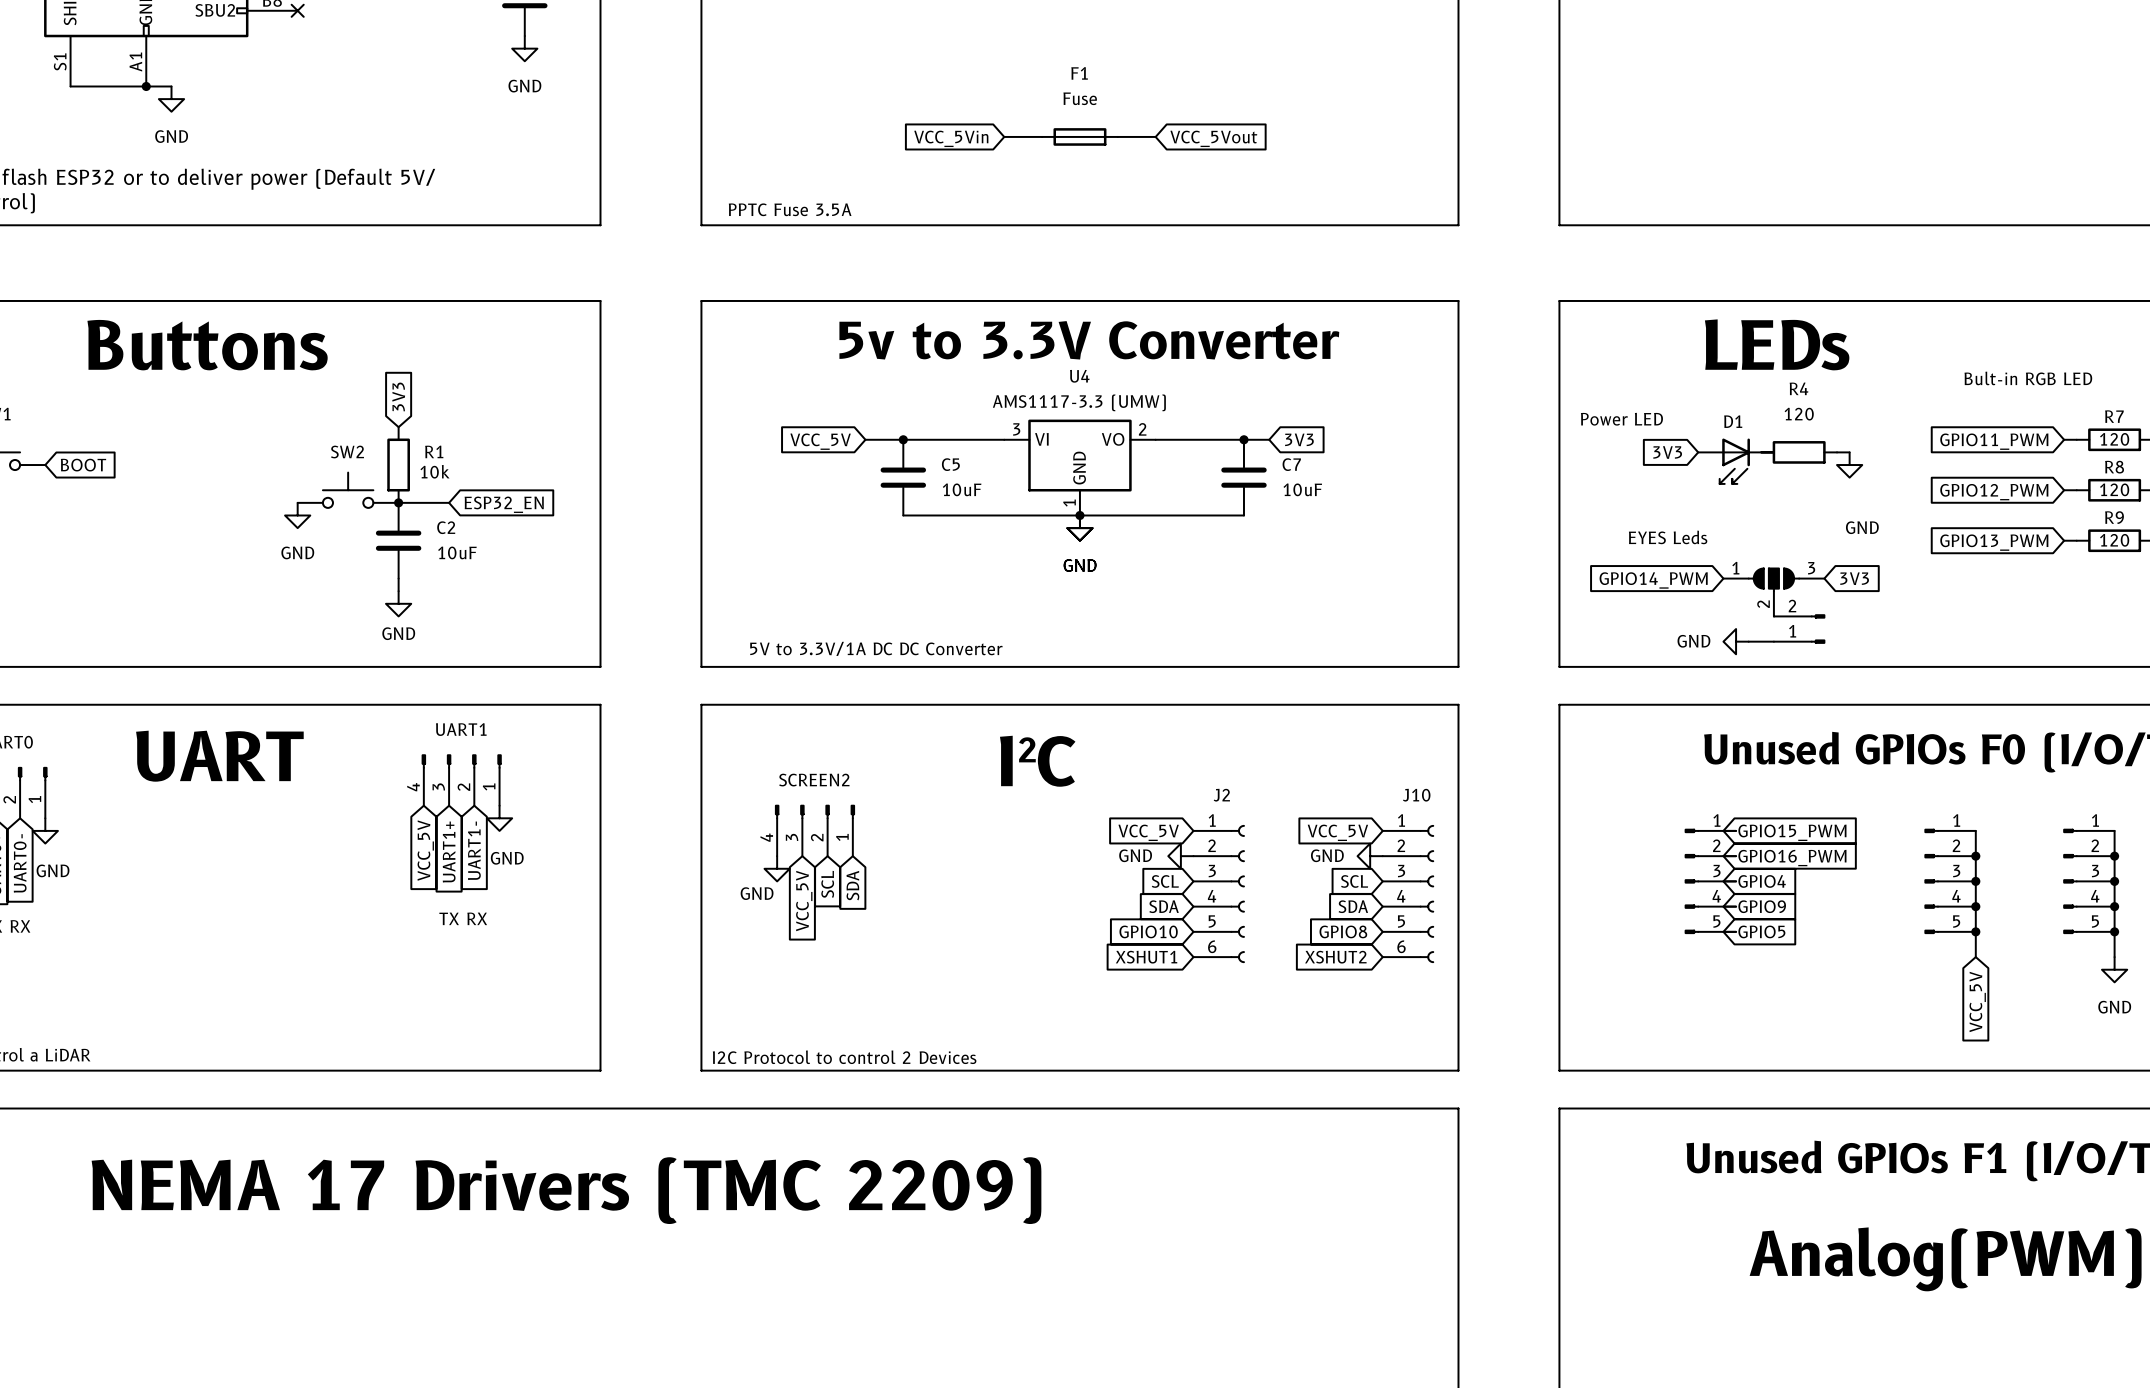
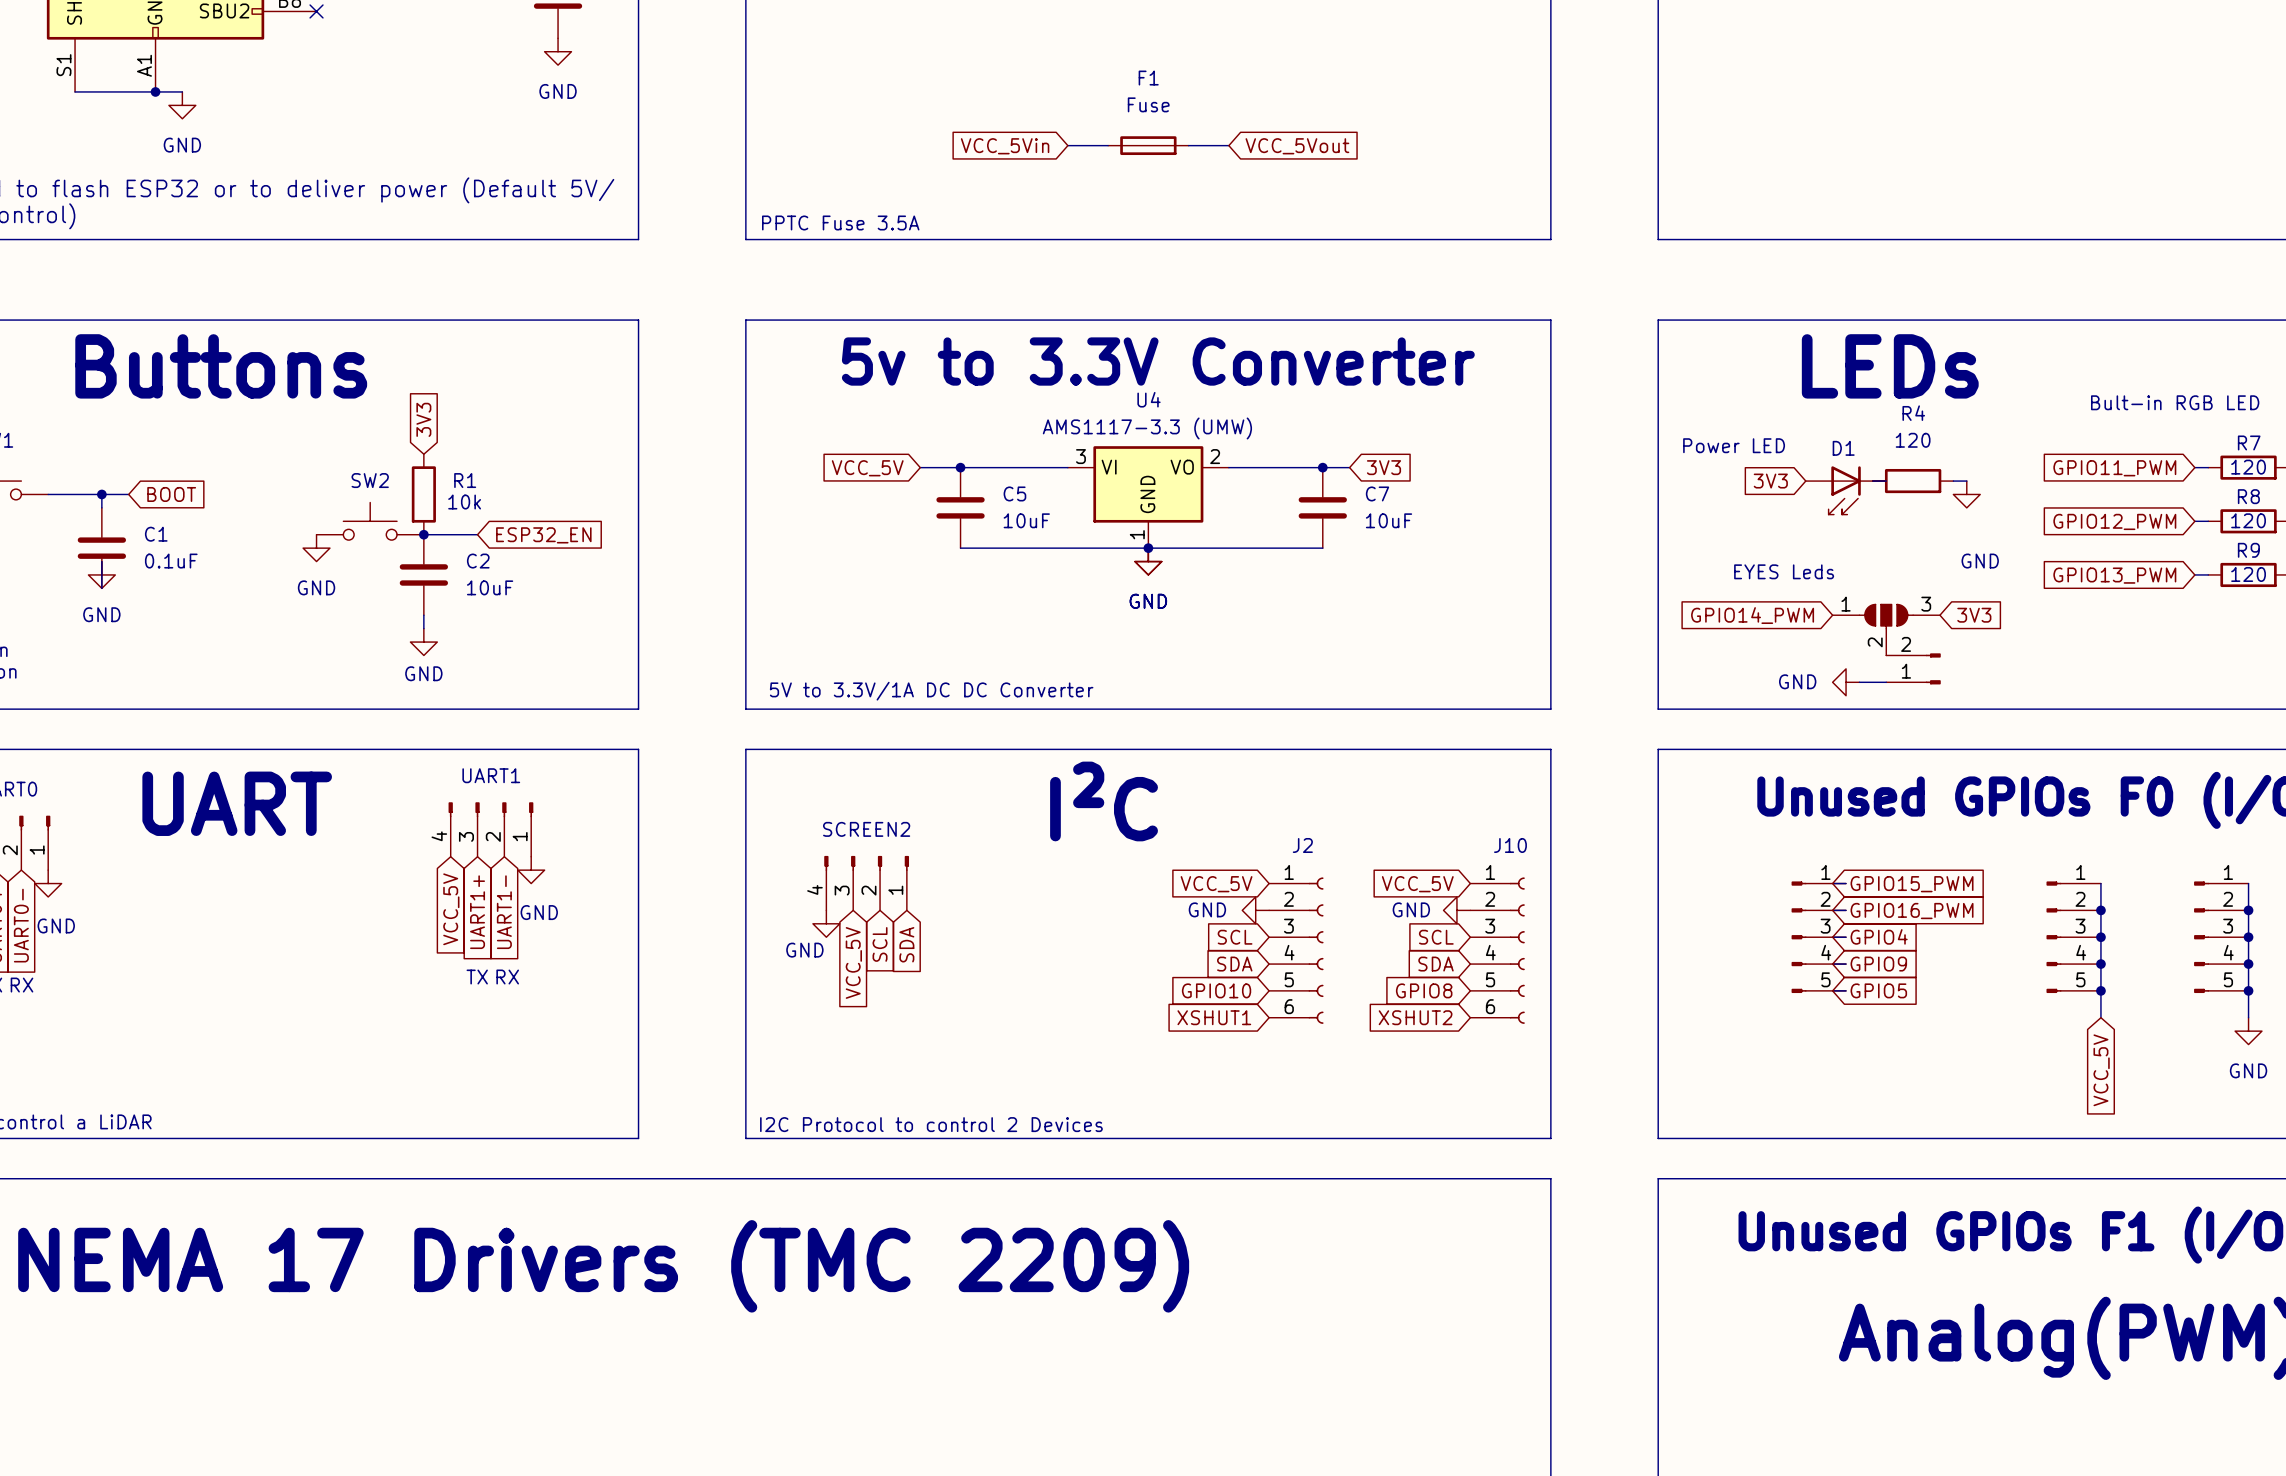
wire: none -> (48, 494) (128, 494)
global label position: BOOT (83, 465) -> BOOT (171, 494)
wire: none -> (101, 494) (101, 507)
junction: none -> (101, 494)
C1: none -> 0.1uF (101, 548)
wire: none -> (101, 561) (101, 588)
power symbol: none -> GND (101, 574)

